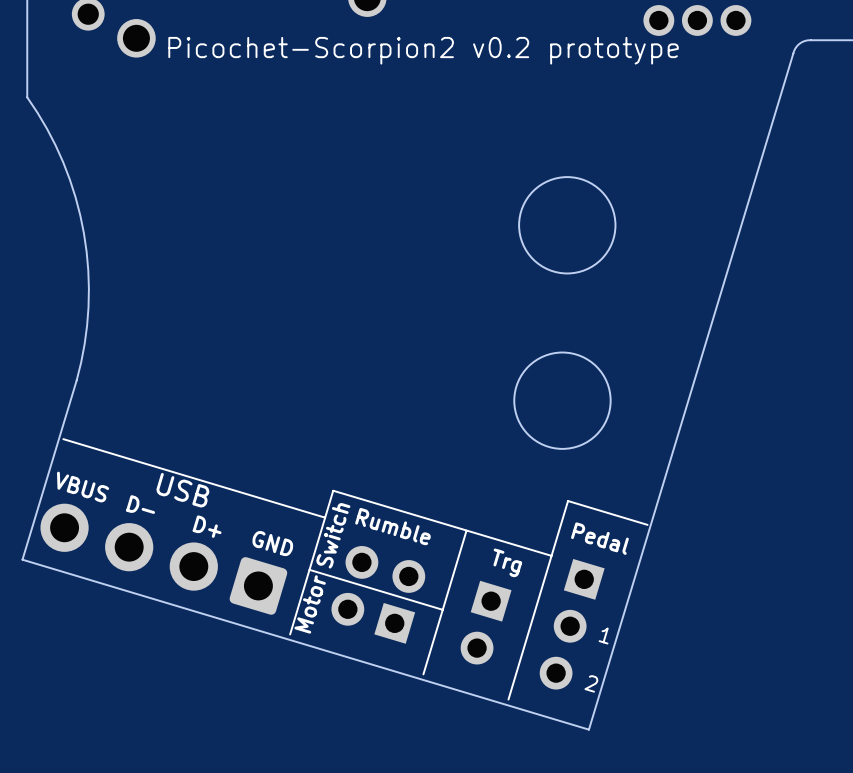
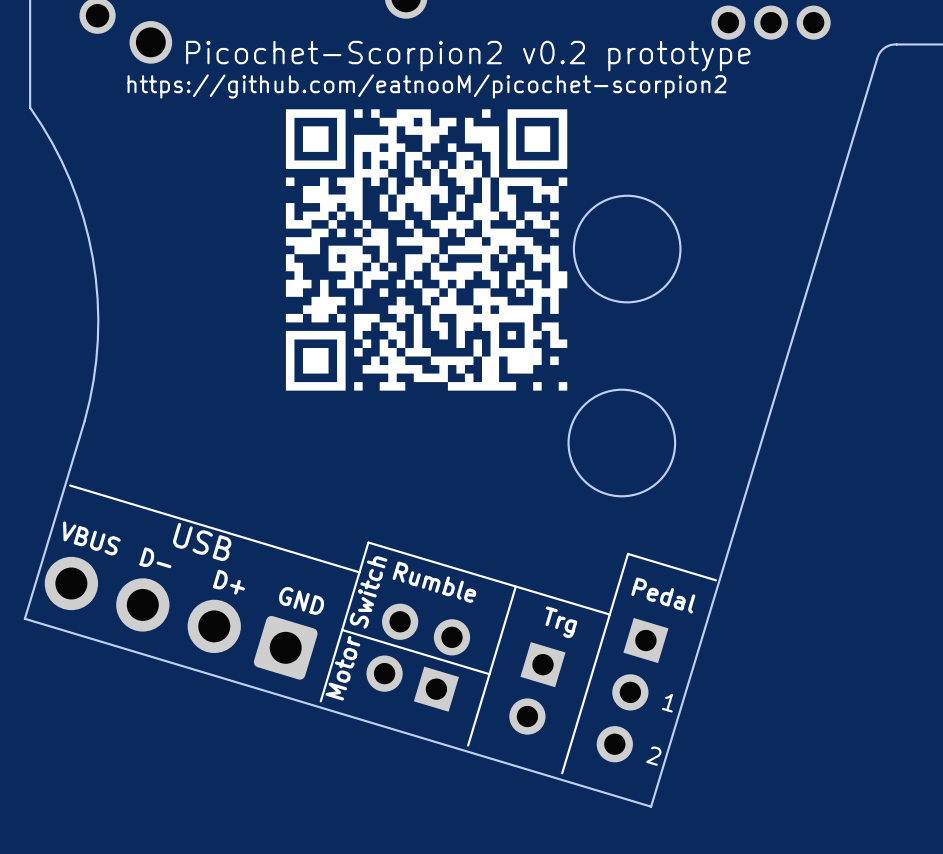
drawing: none -> [285, 109, 568, 391]

